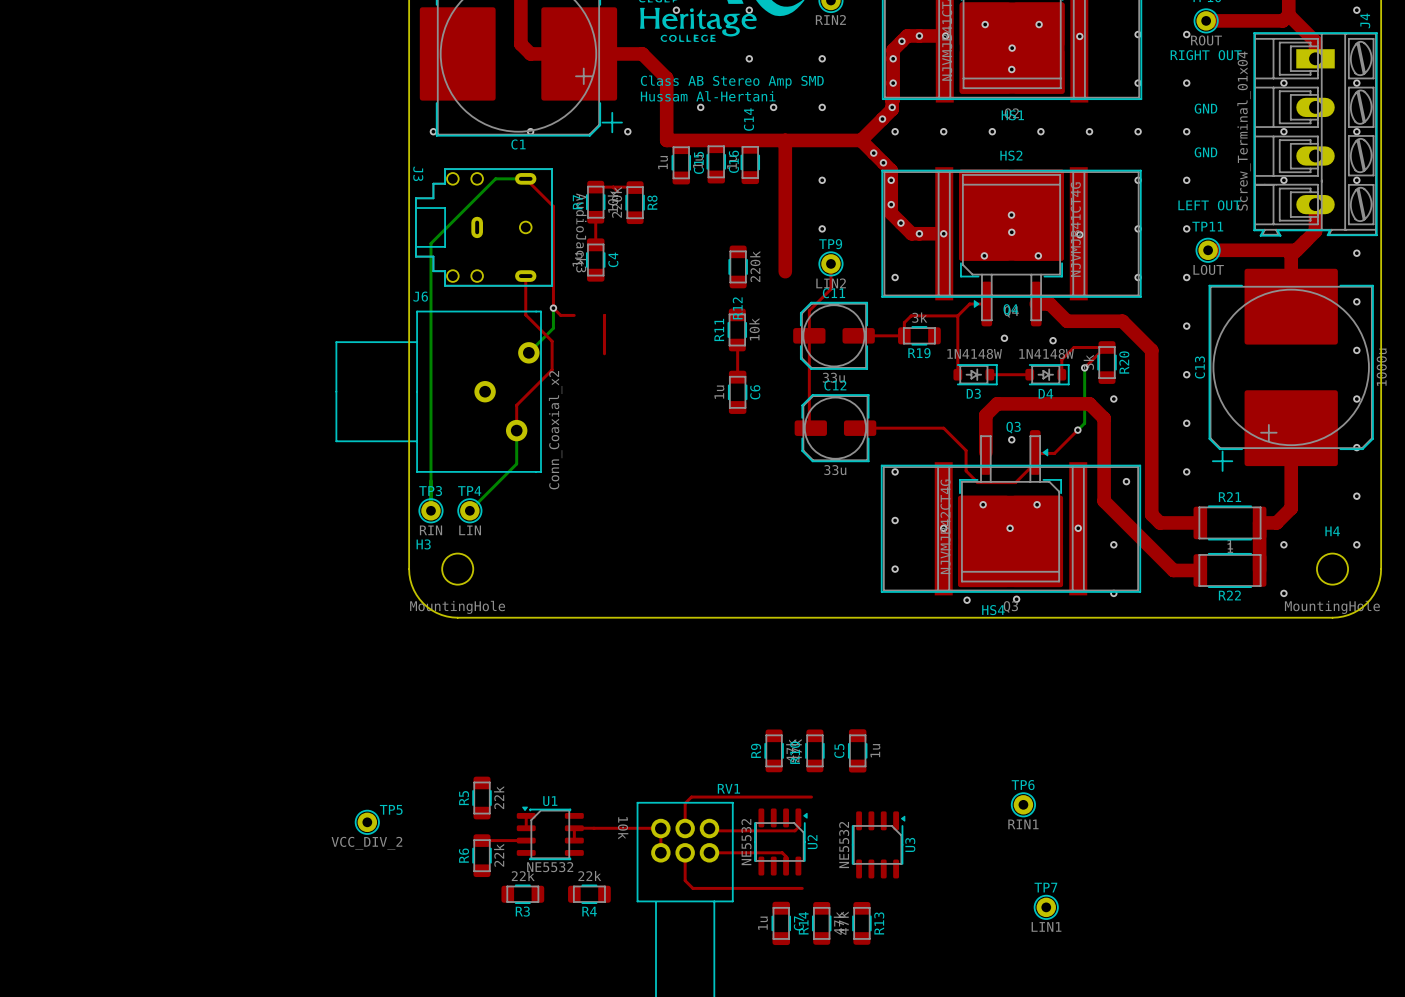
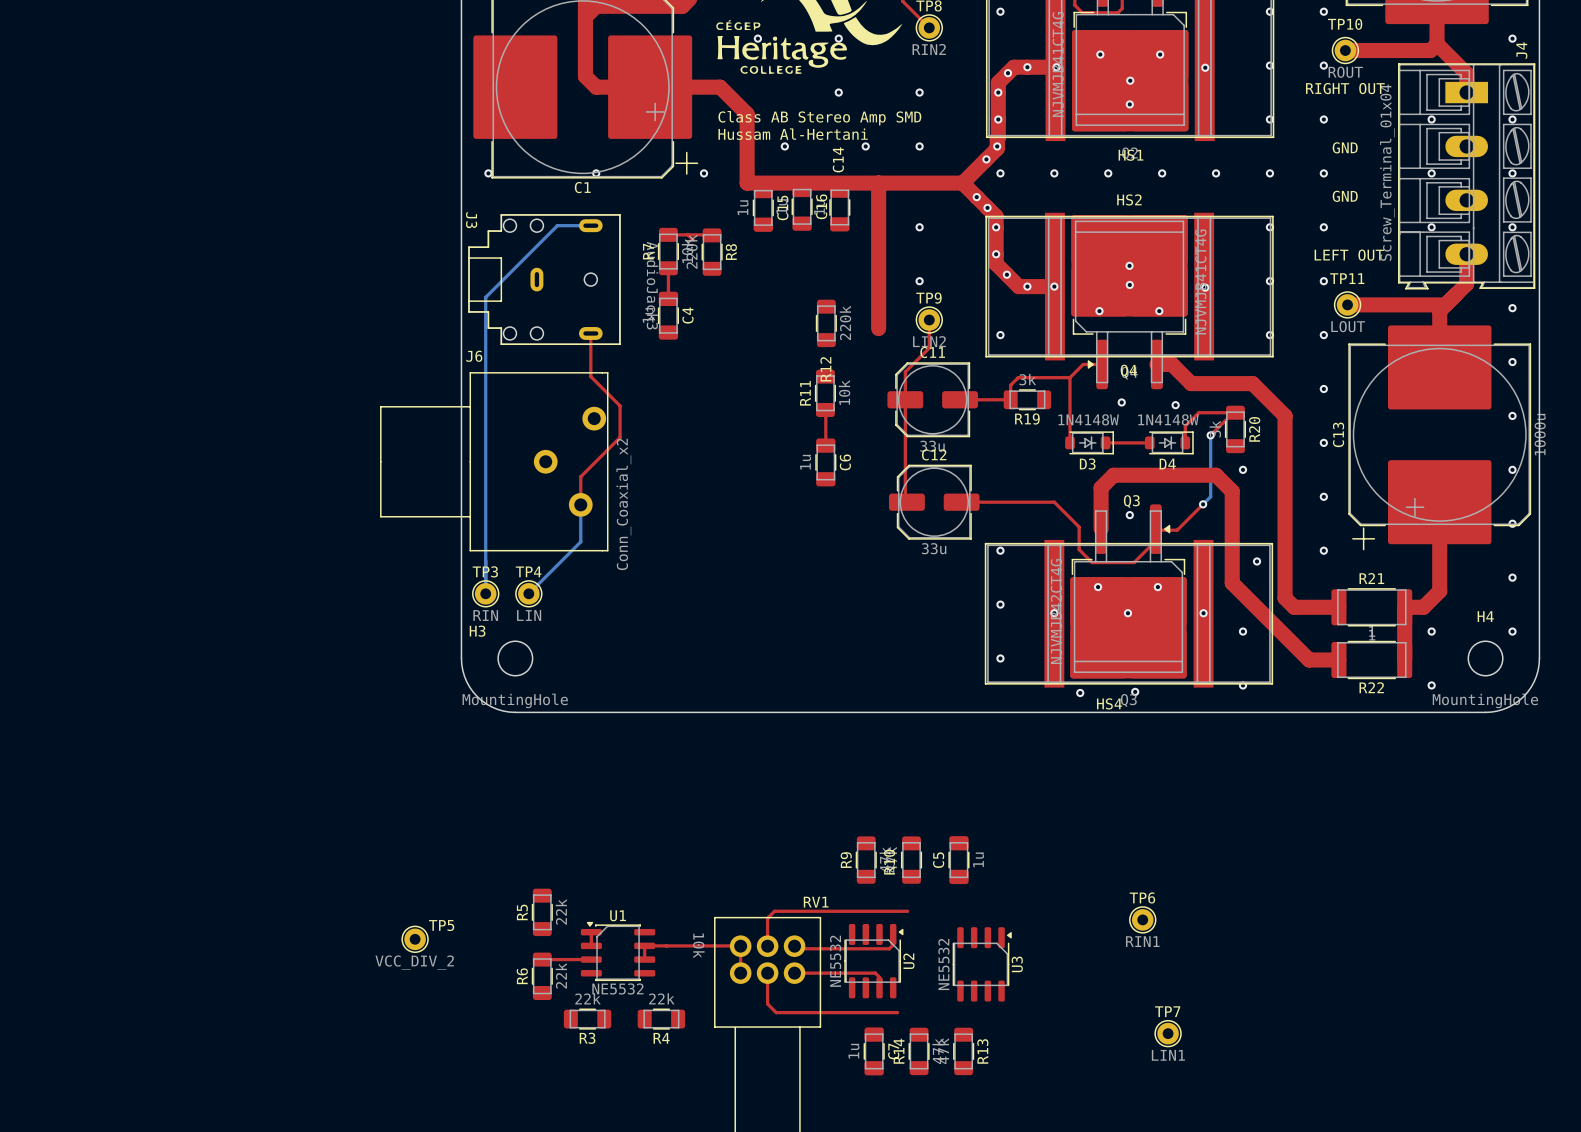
top track: (525, 178) (553, 206) (553, 308) (560, 315) (574, 315) -> none
bottom track: (553, 308) (553, 328) (528, 352) -> none
via: (553, 308) -> none
top track: (604, 315) (604, 353) -> none

